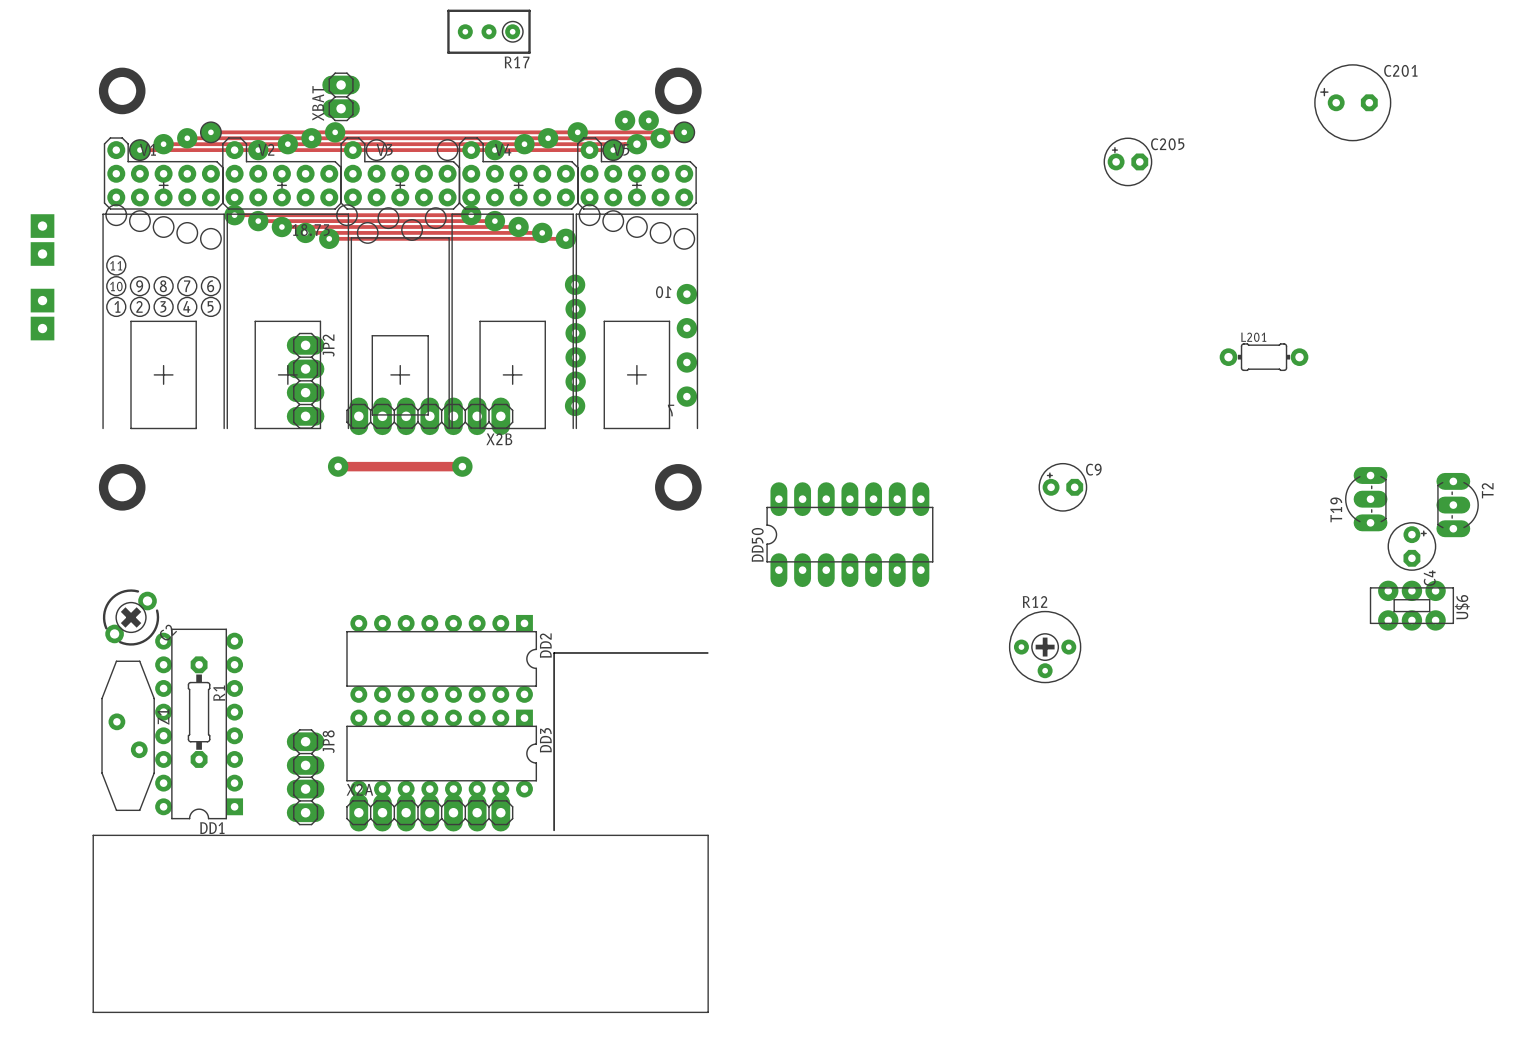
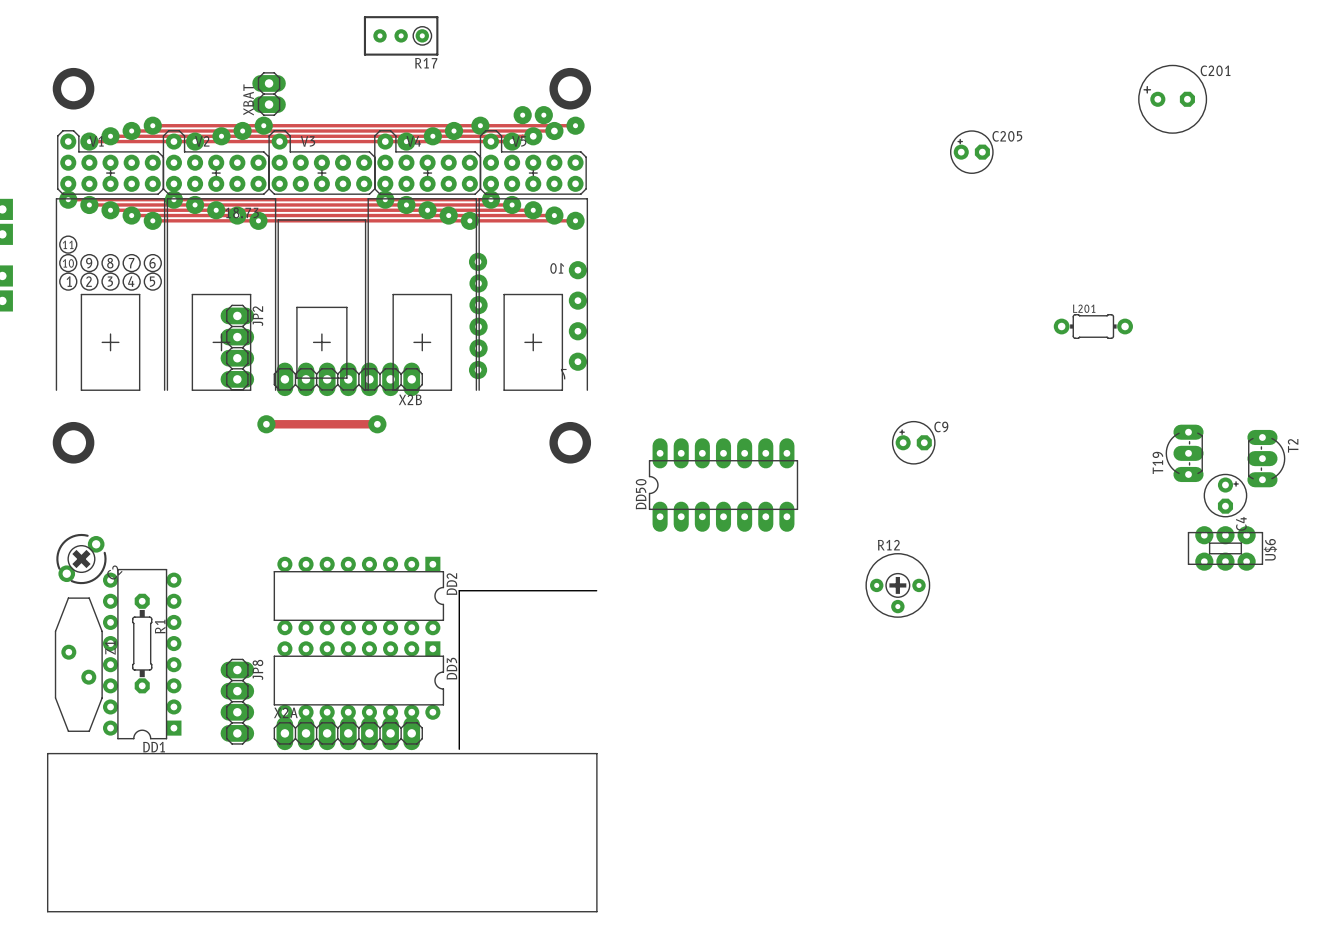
part: (210, 132) -> none
part: (684, 132) -> none
part: (139, 150) -> none
part: (376, 150) -> none
part: (447, 150) -> none
part: (613, 150) -> none
track: none -> (68, 199) (173, 199)
part: (116, 215) -> none
via: none -> (68, 199)
part: (347, 215) -> none
track: none -> (385, 199) (490, 199)
part: (589, 215) -> none
via: none -> (490, 199)
part: (388, 218) -> none
part: (435, 218) -> none
track: none -> (89, 204) (195, 204)
part: (139, 221) -> none
via: none -> (89, 204)
track: none -> (406, 204) (512, 204)
part: (613, 221) -> none
via: none -> (512, 204)
track: none -> (110, 210) (216, 210)
part: (163, 227) -> none
via: none -> (110, 210)
track: none -> (427, 210) (533, 210)
part: (636, 227) -> none
via: none -> (533, 210)
part: (412, 229) -> none
track: none -> (131, 215) (237, 215)
part: (187, 232) -> none
via: none -> (131, 215)
part: (367, 232) -> none
track: none -> (448, 215) (554, 215)
part: (660, 232) -> none
via: none -> (554, 215)
track: none -> (152, 220) (258, 220)
part: (210, 238) -> none
via: none -> (152, 220)
track: none -> (469, 220) (575, 220)
part: (684, 238) -> none
via: none -> (575, 220)

